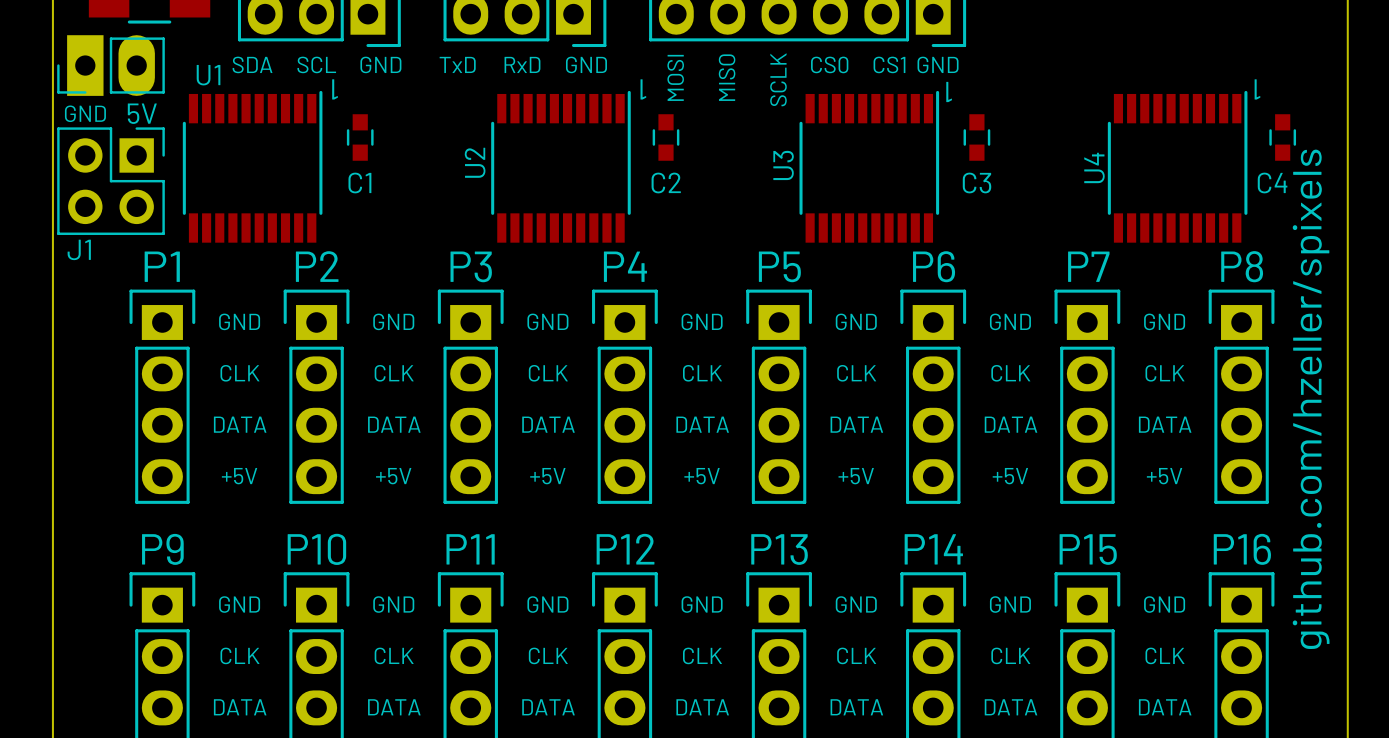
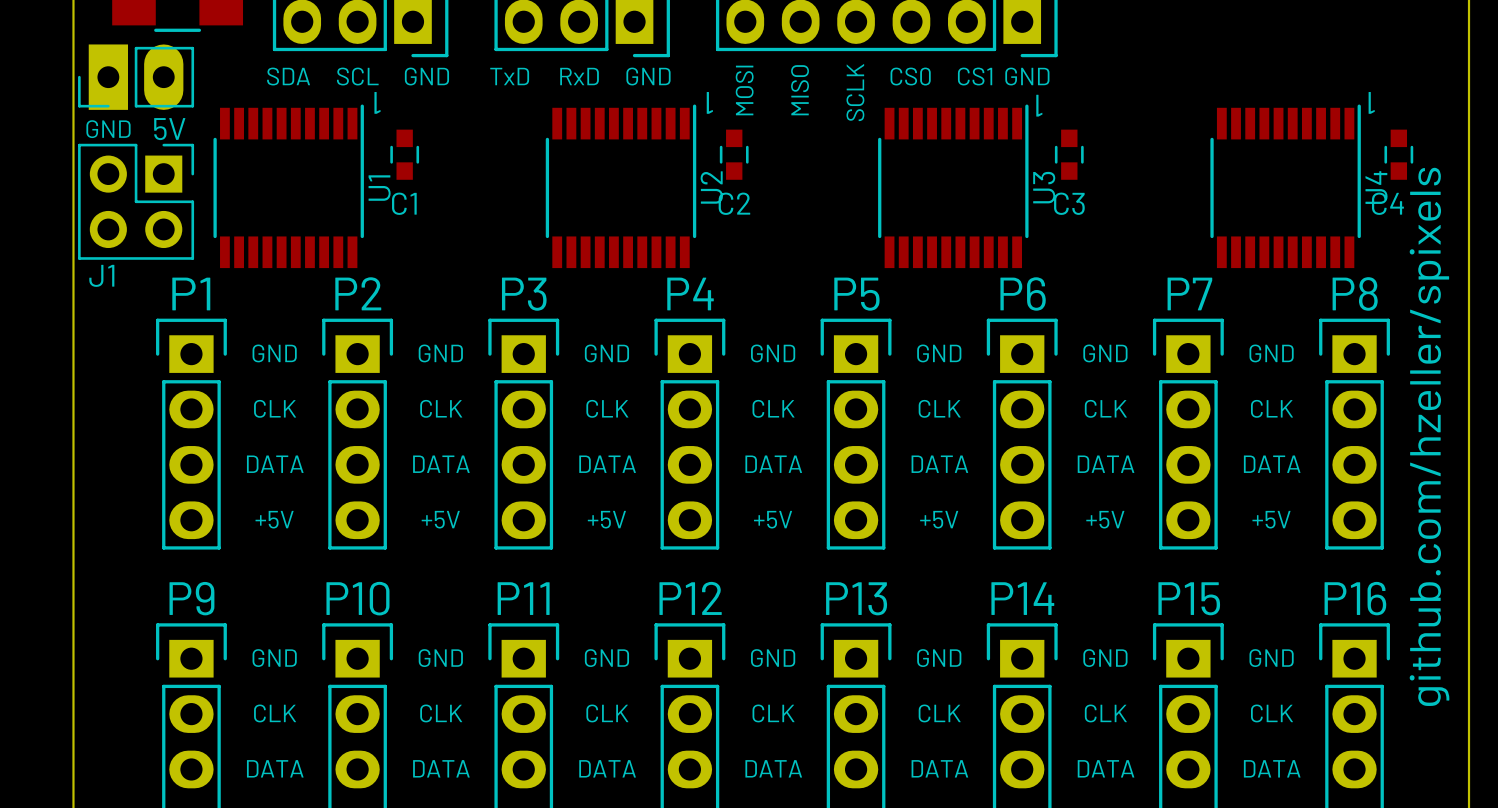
U1 name rotation: 0° (208, 75) -> 90° counterclockwise (379, 188)
U1 name position: U1 (208, 75) -> U1 (379, 188)
U2 name position: U2 (475, 162) -> U2 (711, 187)
U3 name position: U3 (783, 165) -> U3 (1044, 187)
U4 name position: U4 (1094, 167) -> U4 (1376, 187)

